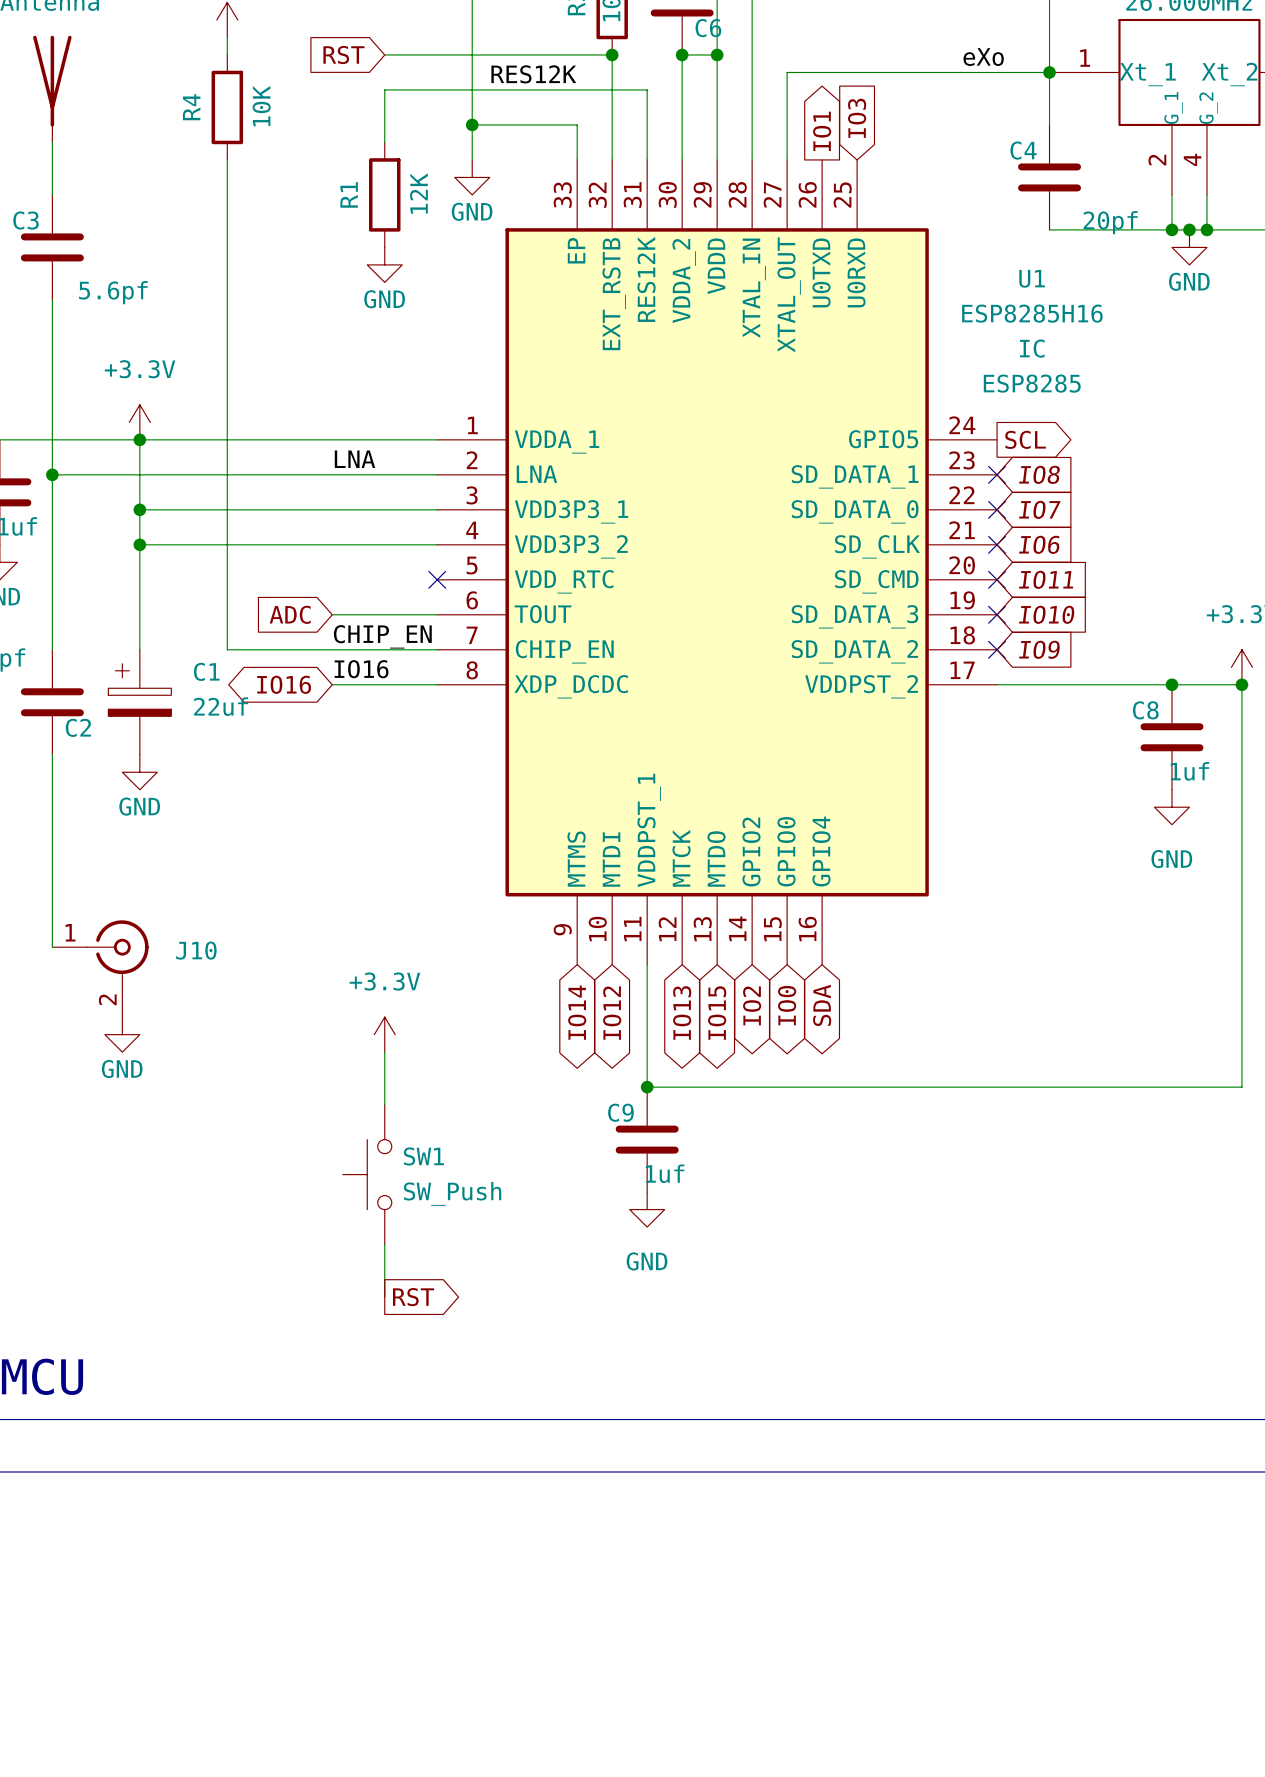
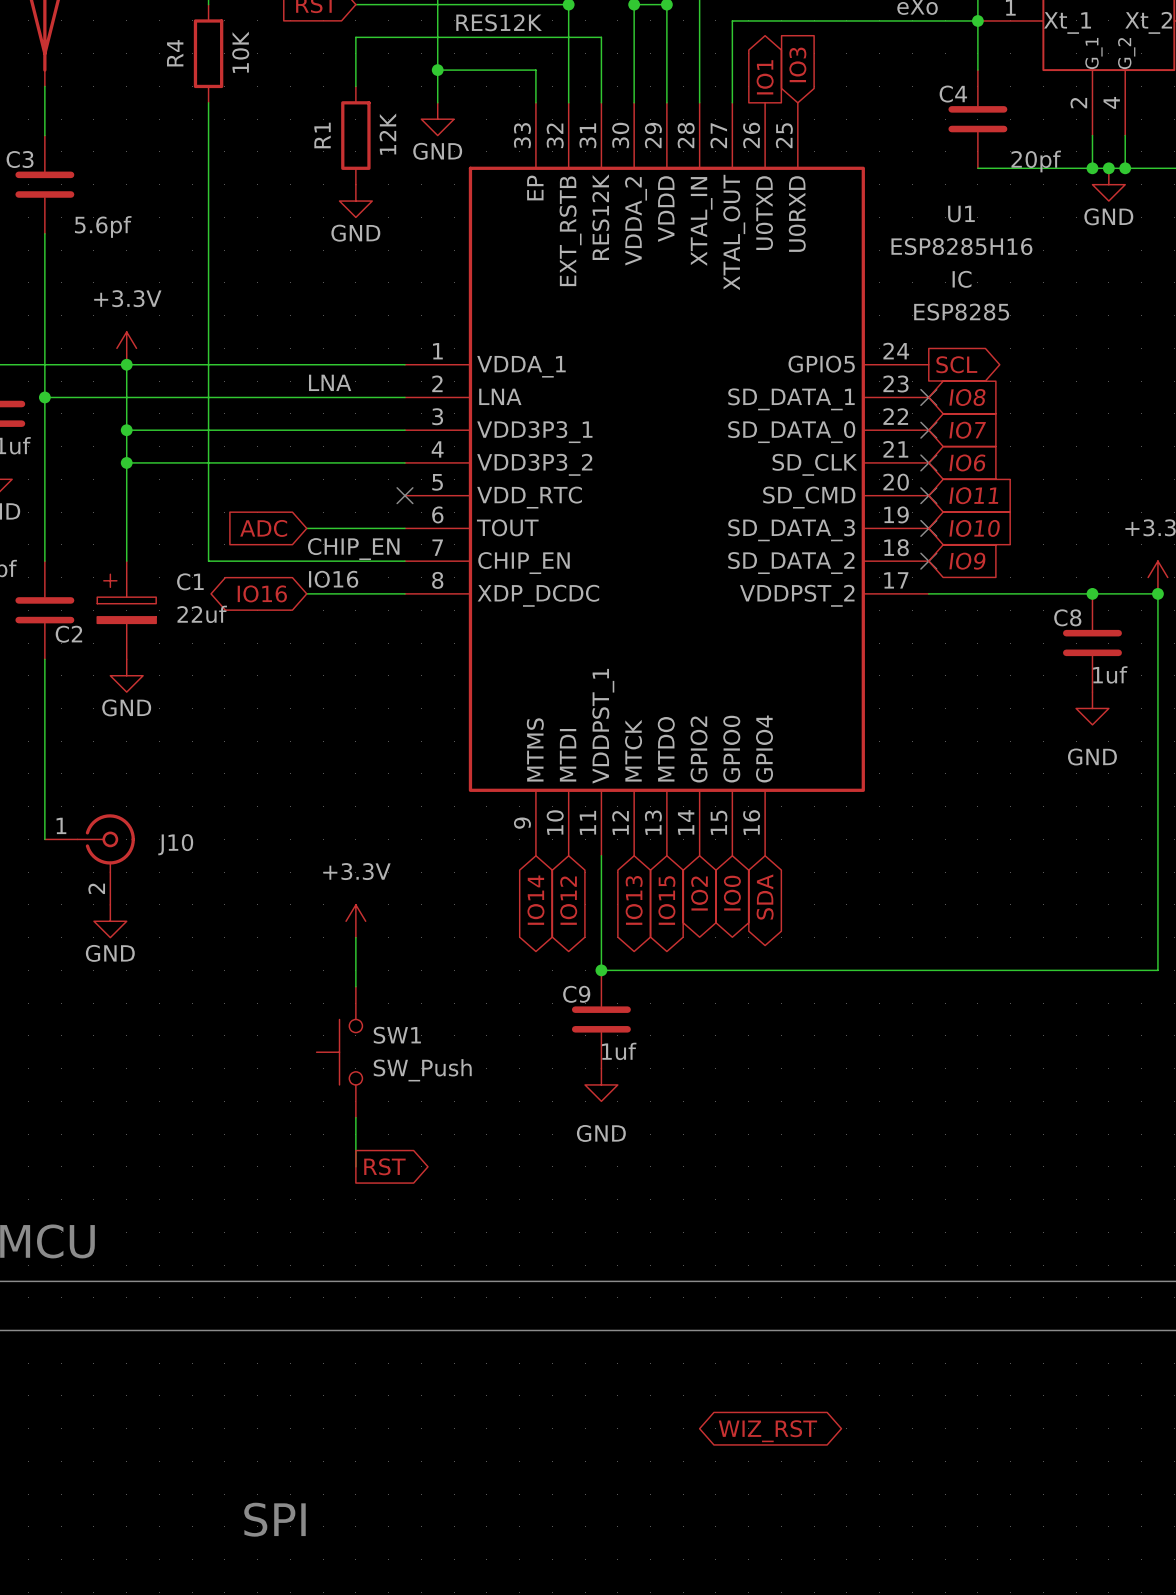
global label: none -> WIZ_RST (767, 1431)
text: none -> SPI (274, 1519)

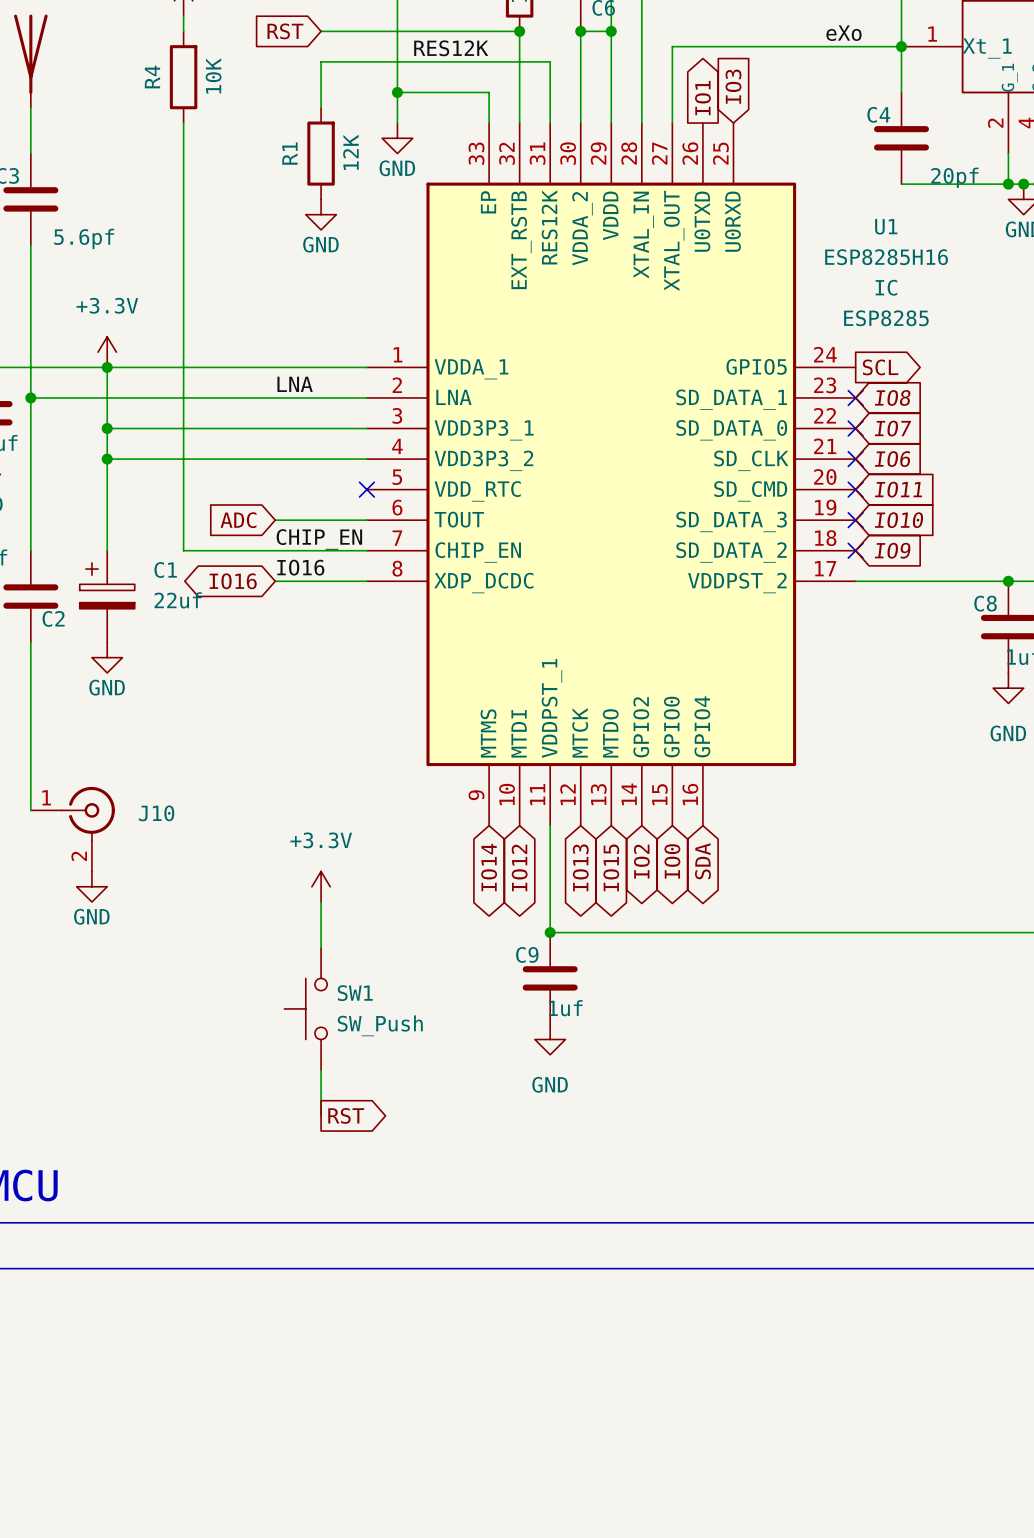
global label: WIZ_RST (767, 1431) -> none
text: SPI (274, 1519) -> none

